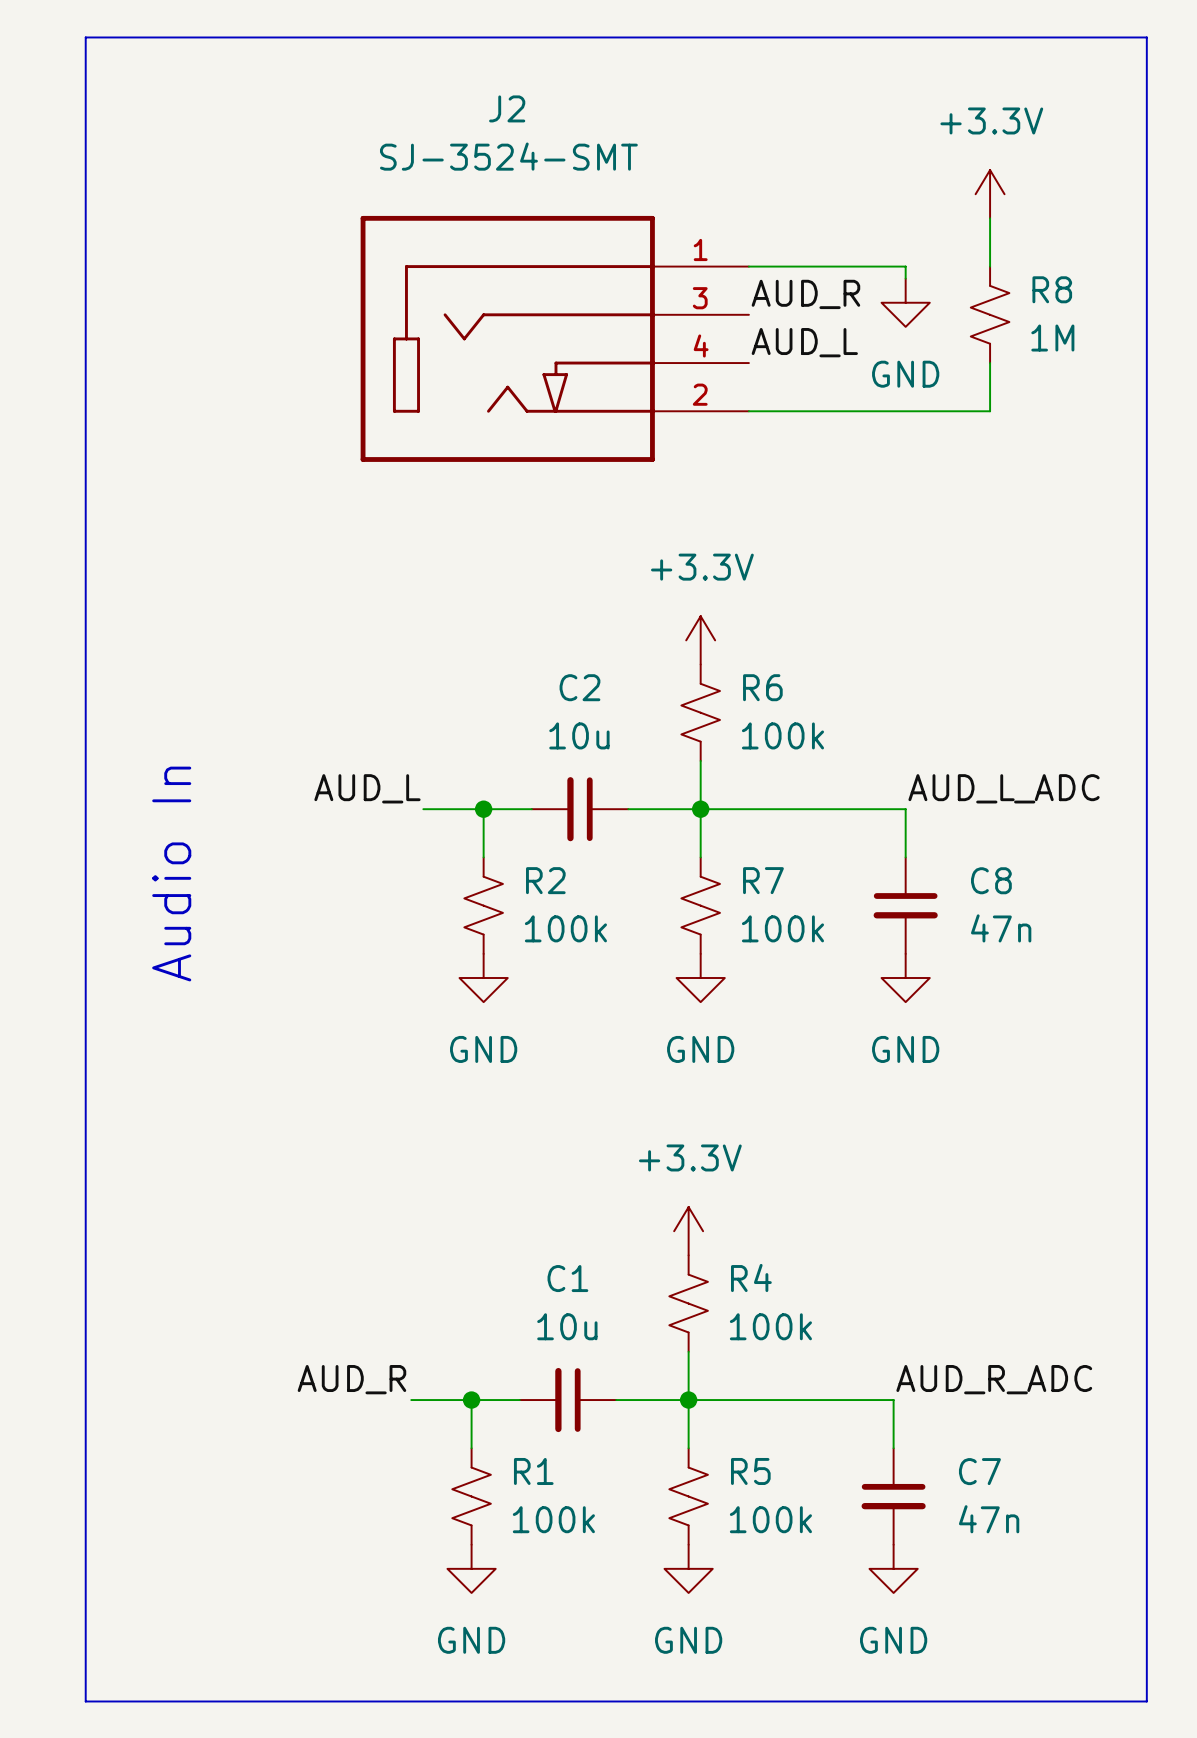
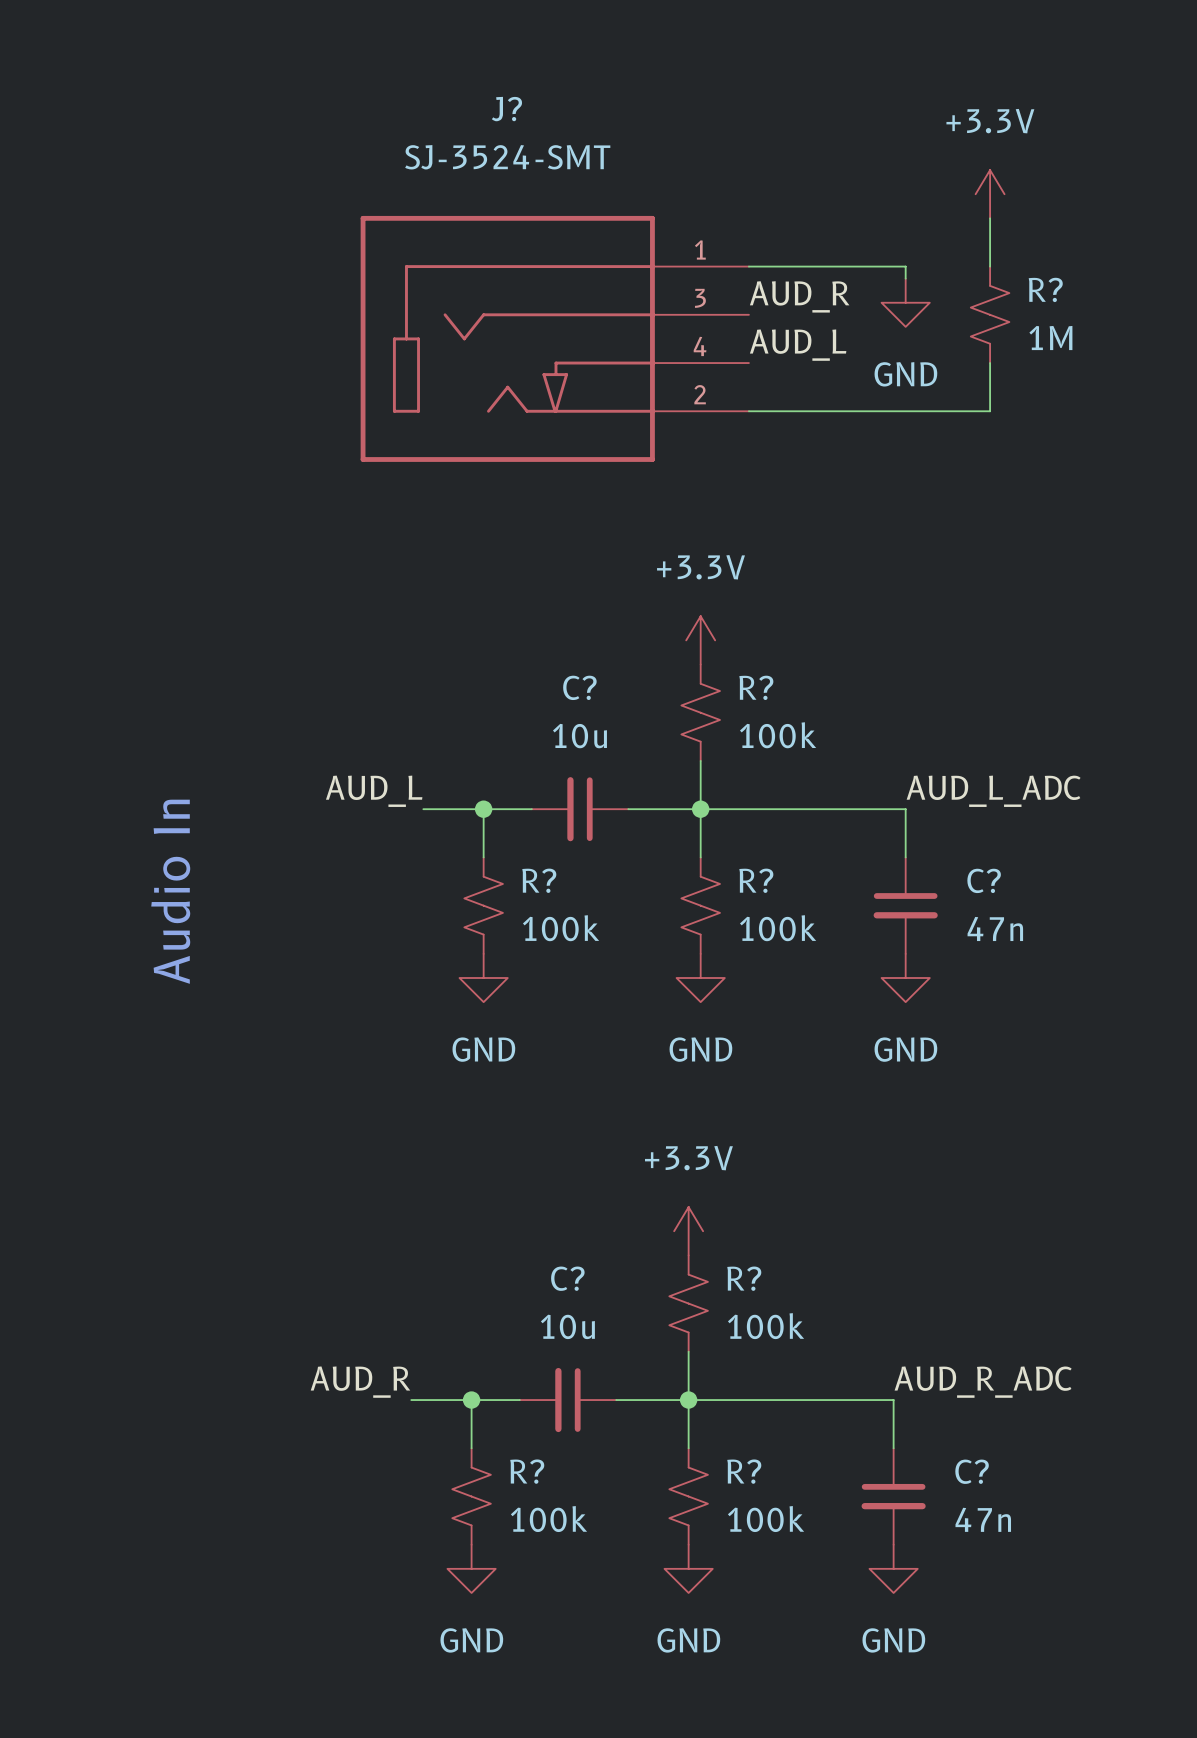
line: (85, 37) (1146, 37) (1146, 1701) (85, 1701) (85, 37) -> none
J2 name: J2 (507, 108) -> J? (506, 109)
R8 name: R8 (1052, 289) -> R? (1045, 289)
C2 name: C2 (579, 687) -> C? (579, 687)
R6 name: R6 (762, 687) -> R? (756, 687)
R2 name: R2 (545, 880) -> R? (539, 880)
R7 name: R7 (763, 880) -> R? (756, 880)
C8 name: C8 (991, 880) -> C? (984, 880)
R4 name: R4 (751, 1277) -> R? (744, 1278)
C1 name: C1 (567, 1278) -> C? (567, 1278)
R1 name: R1 (533, 1471) -> R? (527, 1471)
R5 name: R5 (750, 1471) -> R? (744, 1471)
C7 name: C7 (979, 1471) -> C? (972, 1471)

